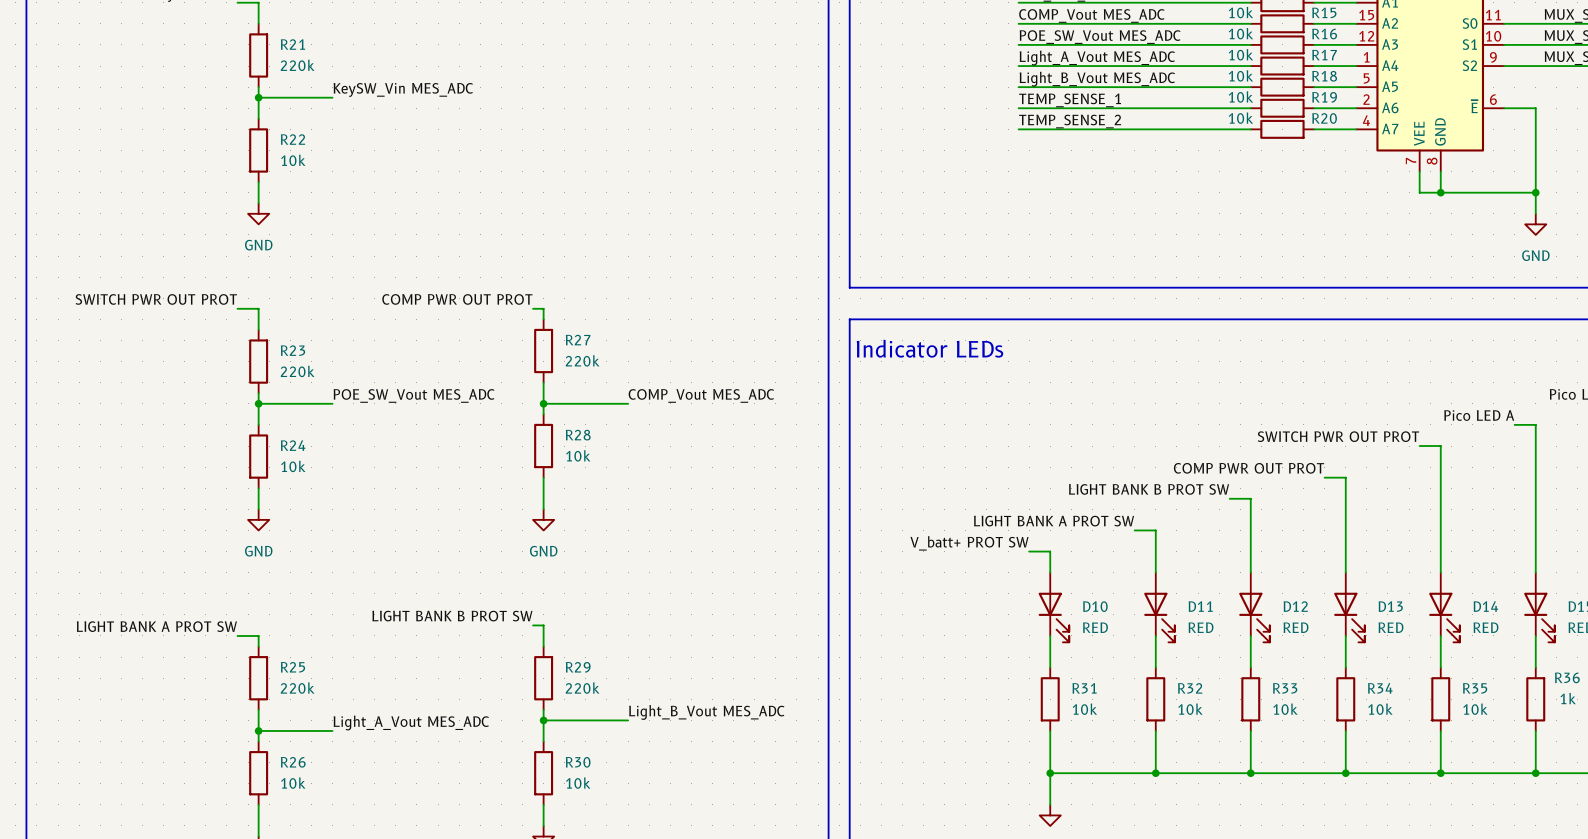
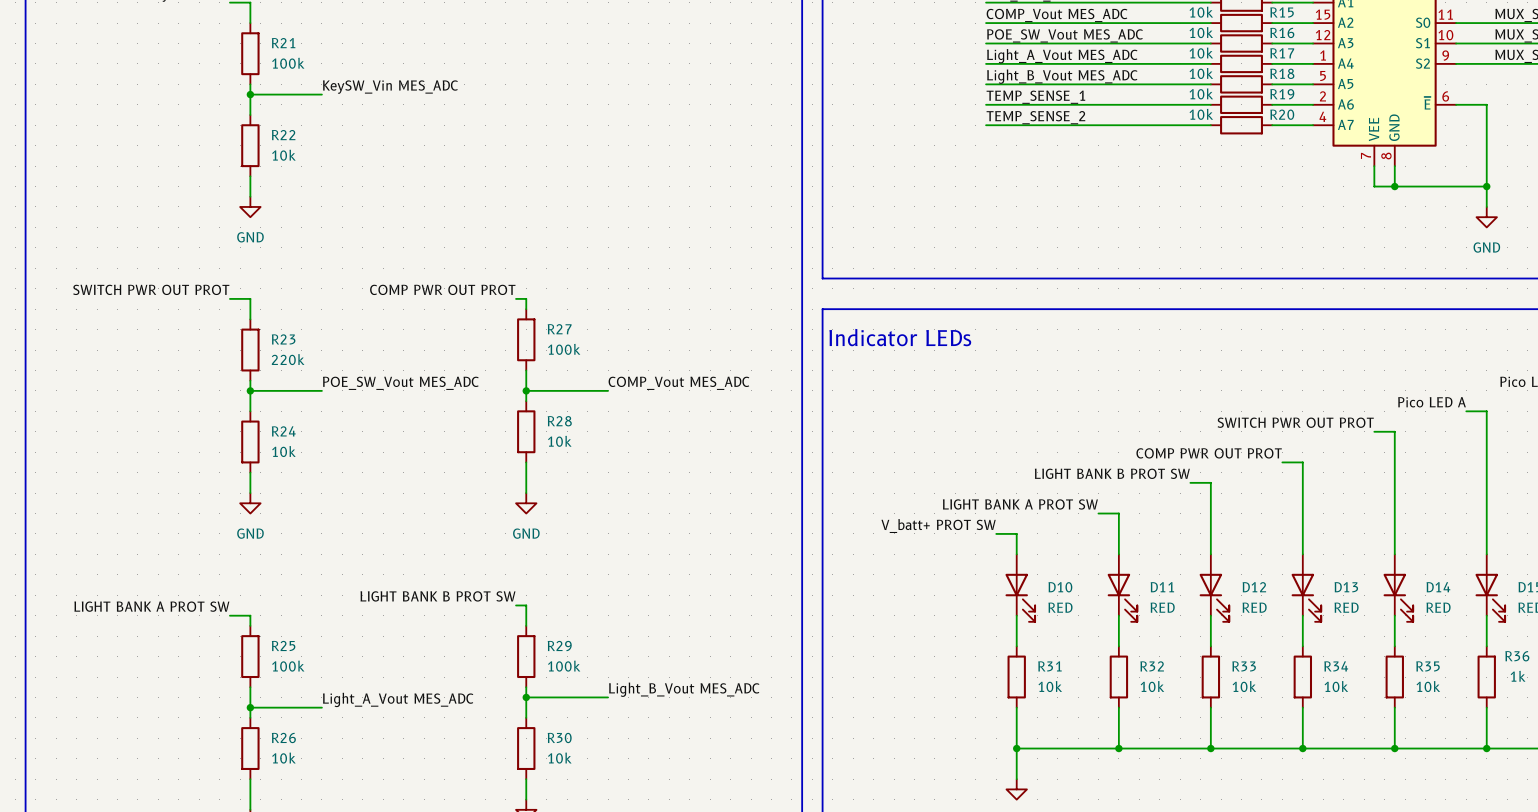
R21 value: 220k (297, 65) -> 100k (288, 63)
R27 value: 220k (582, 360) -> 100k (564, 349)
R25 value: 220k (297, 688) -> 100k (288, 666)
R29 value: 220k (582, 688) -> 100k (564, 666)

